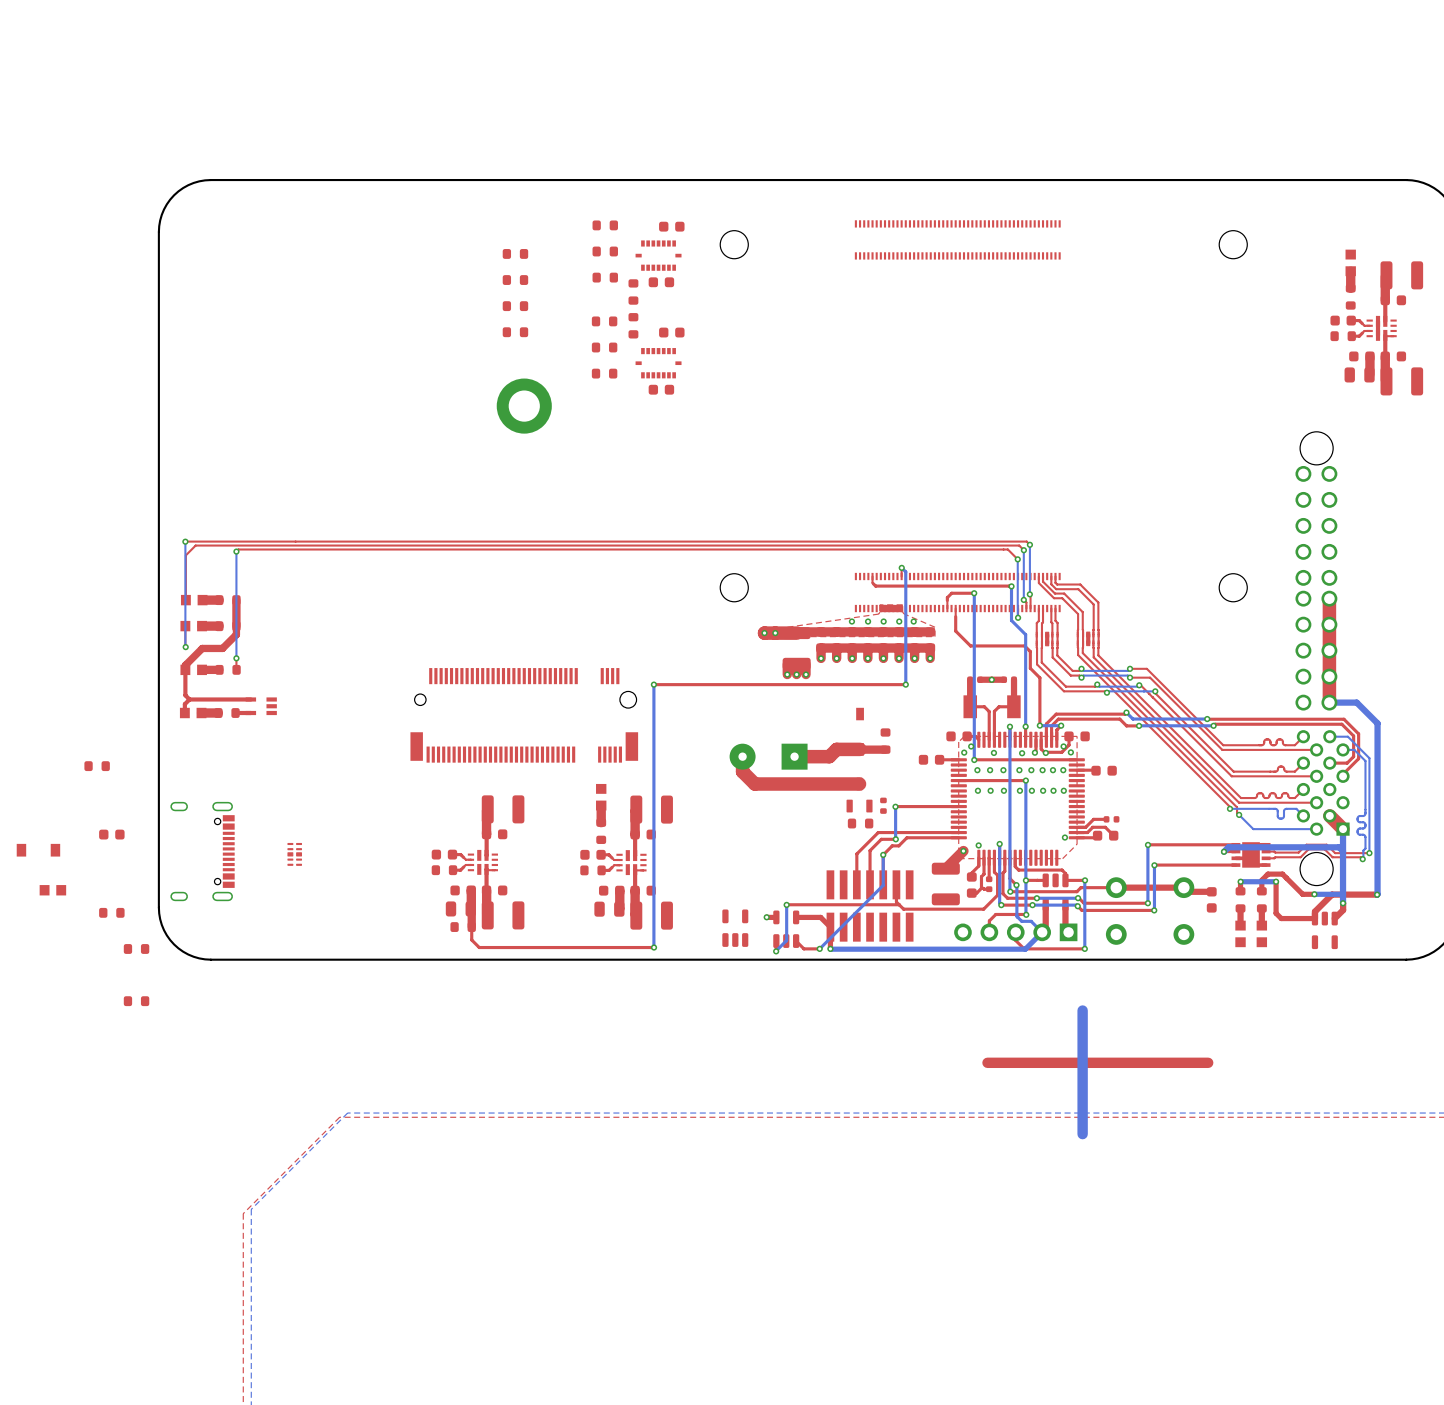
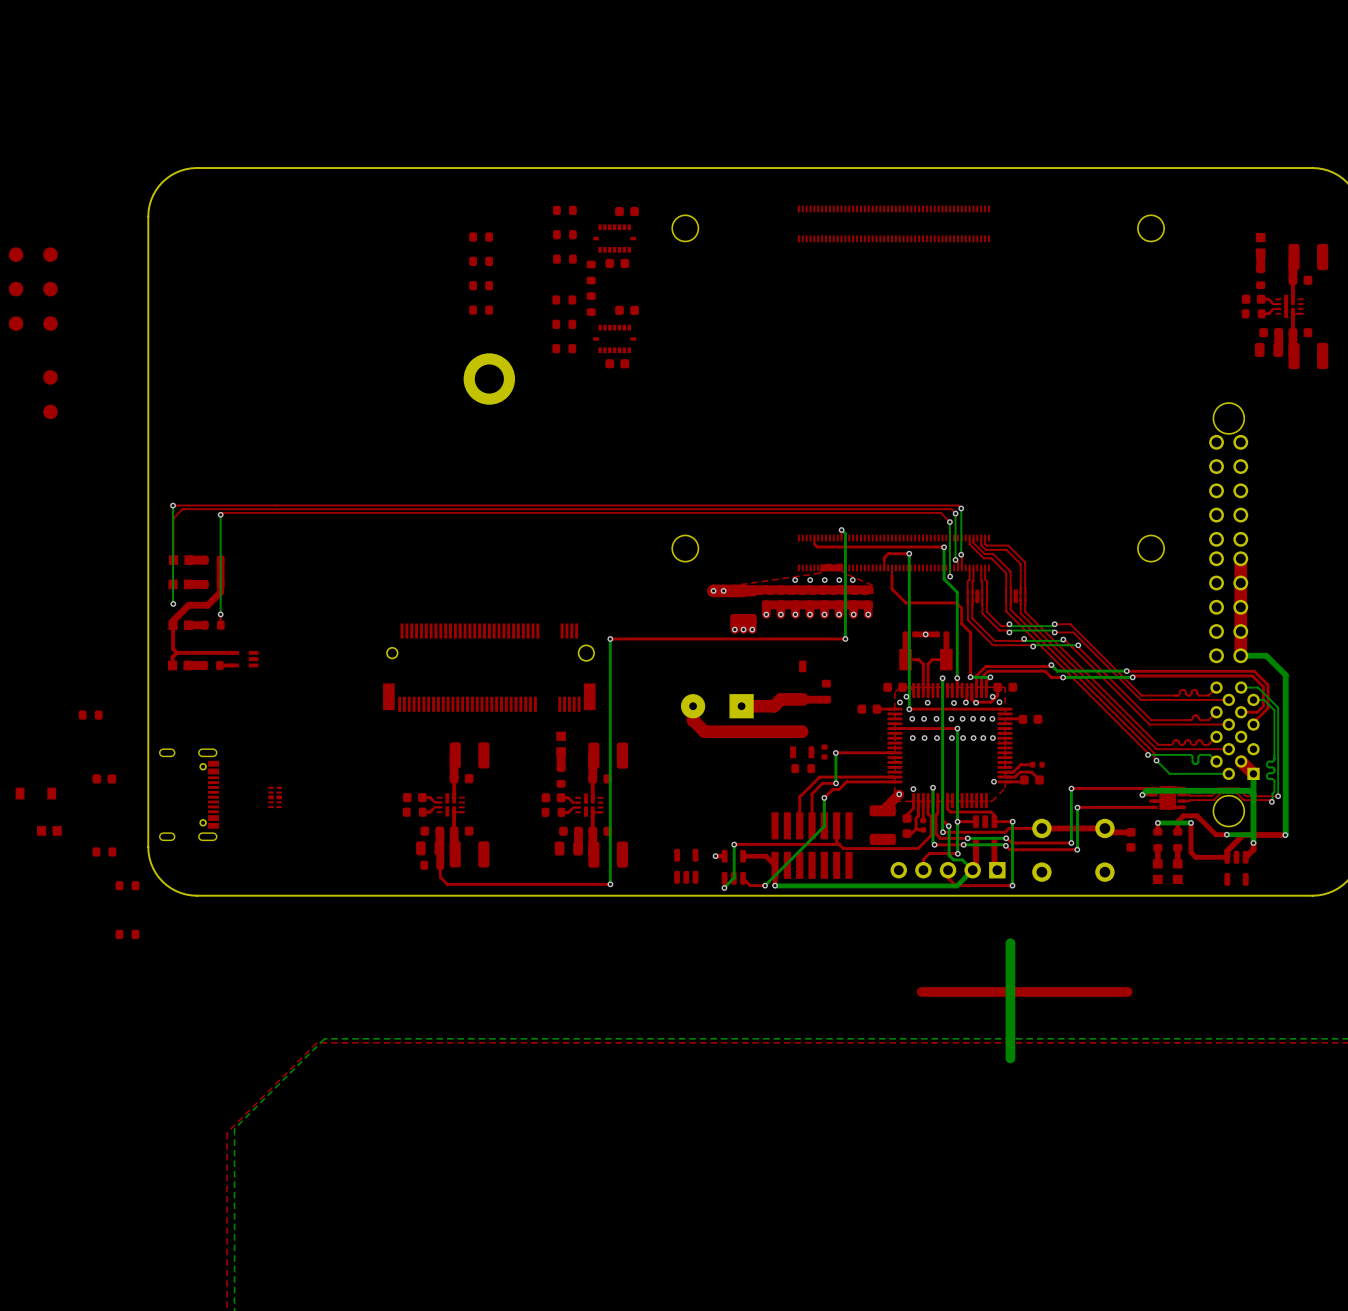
part: none -> (16, 254)
part: none -> (50, 254)
part: none -> (16, 289)
part: none -> (50, 289)
part: none -> (16, 323)
part: none -> (50, 323)
part: none -> (50, 377)
part: none -> (50, 411)

